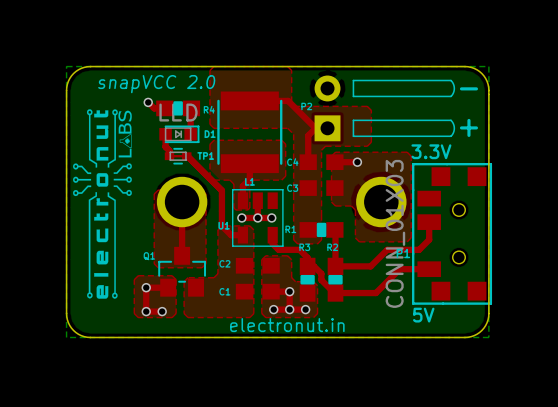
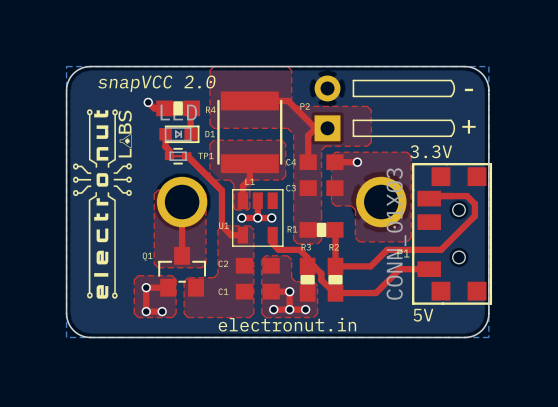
top track: (429, 222) (429, 239) (419, 249) -> (429, 196) (466, 196) (474, 204) (474, 215) (441, 249) (419, 249)

